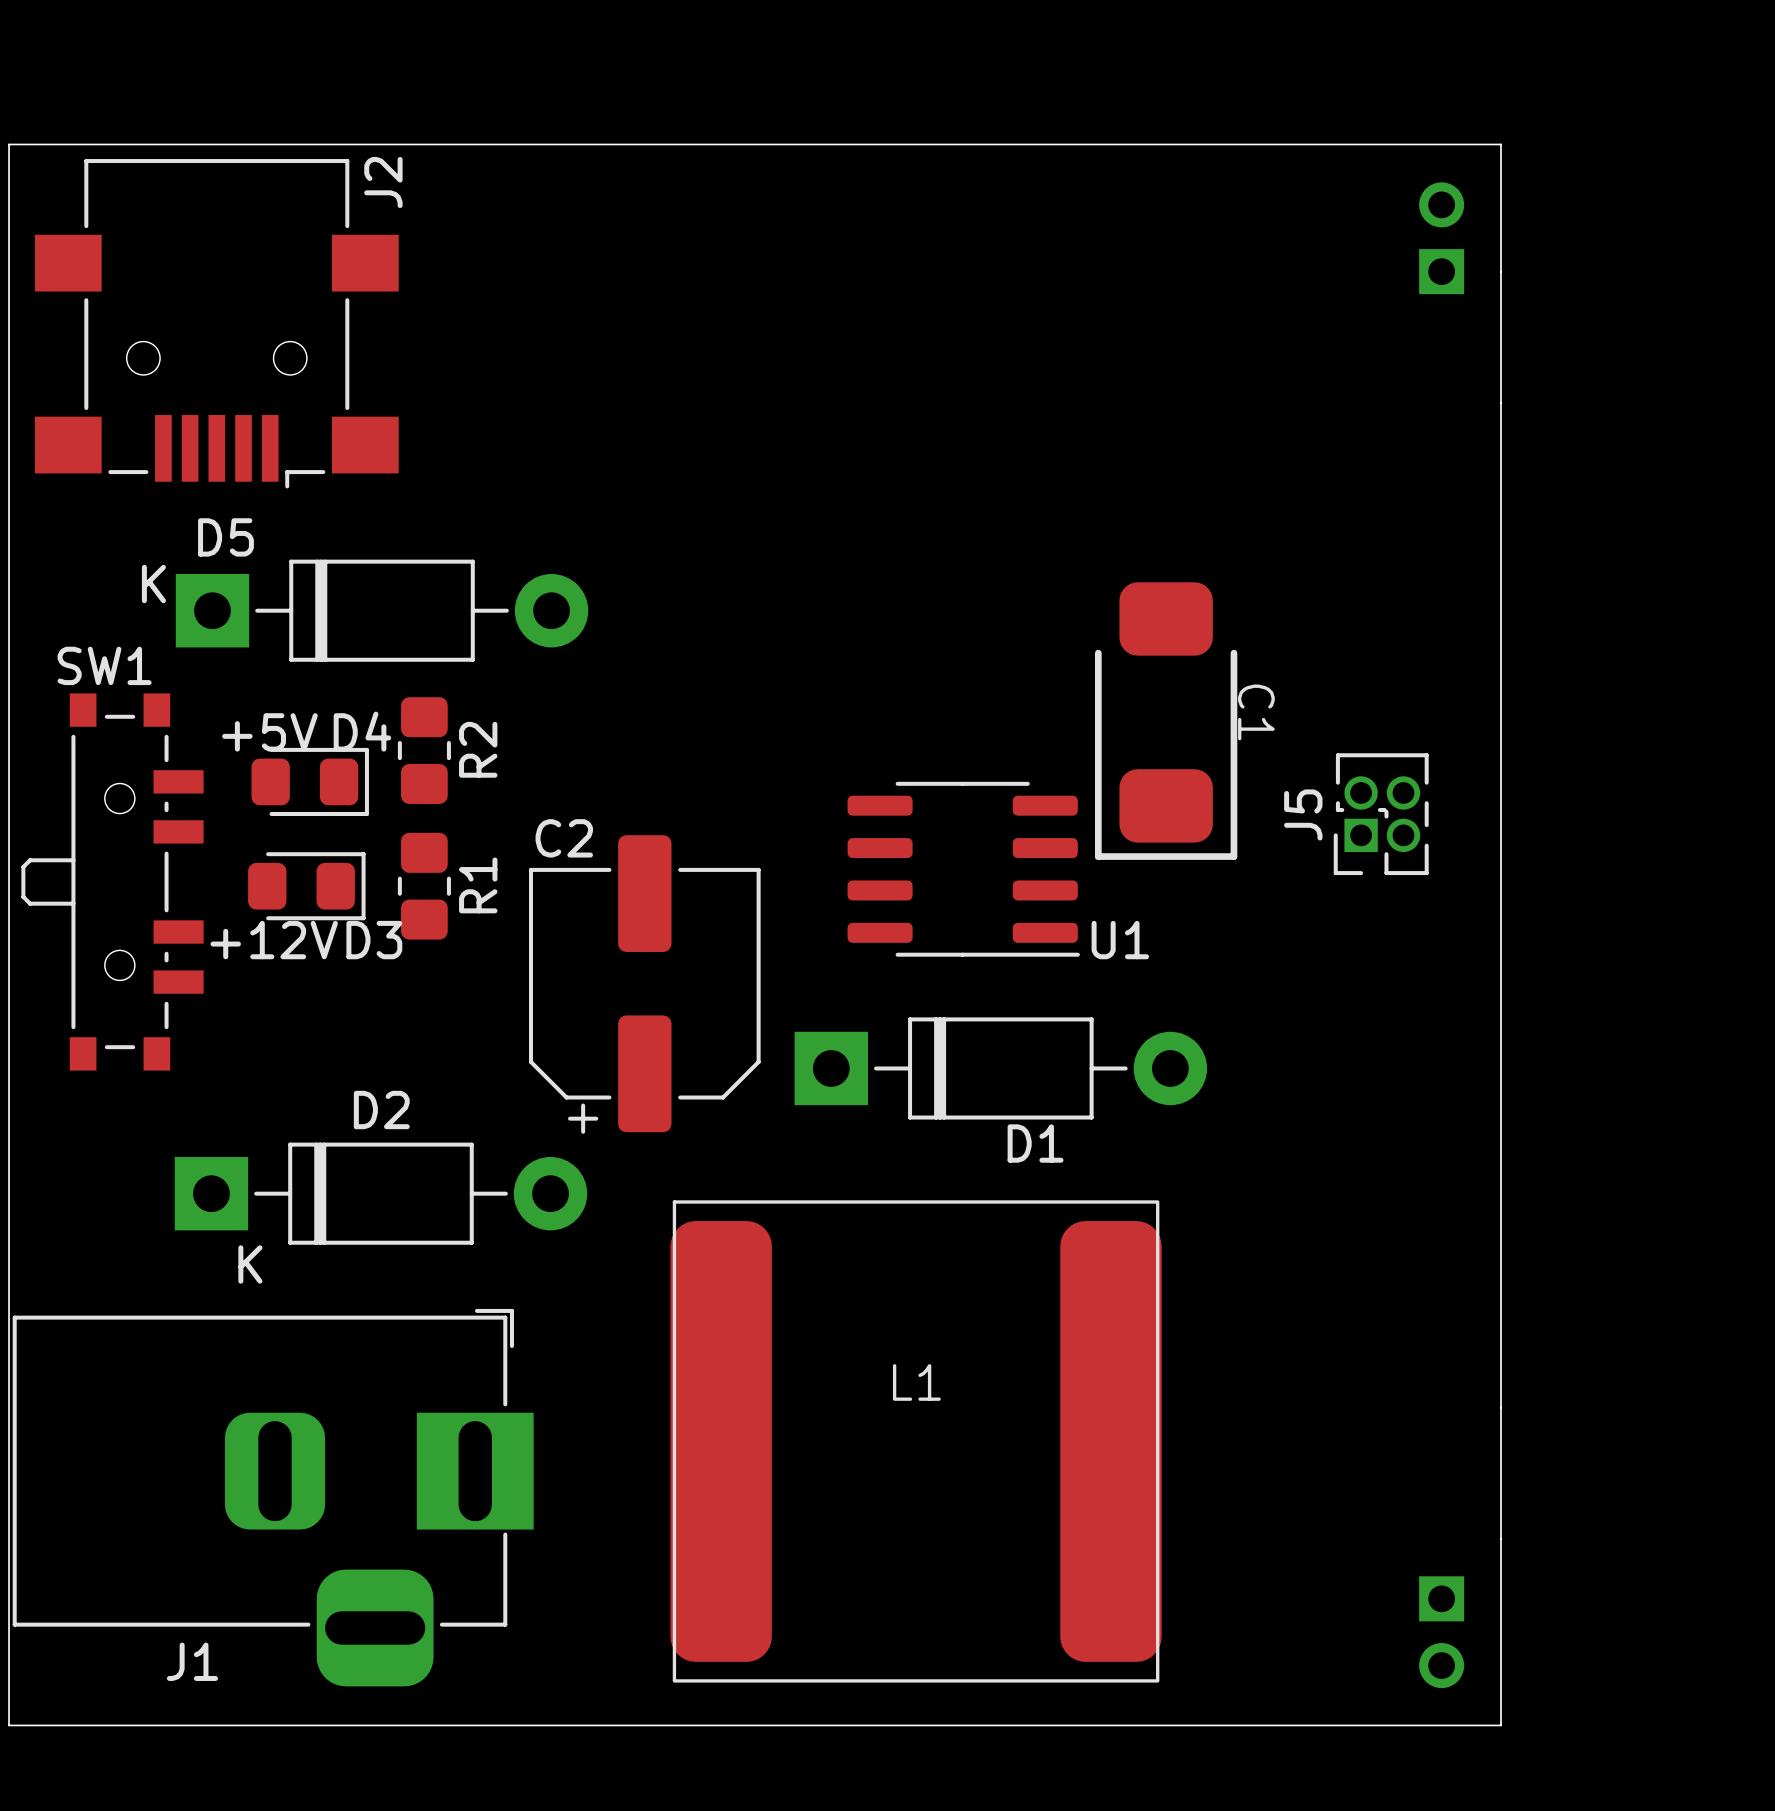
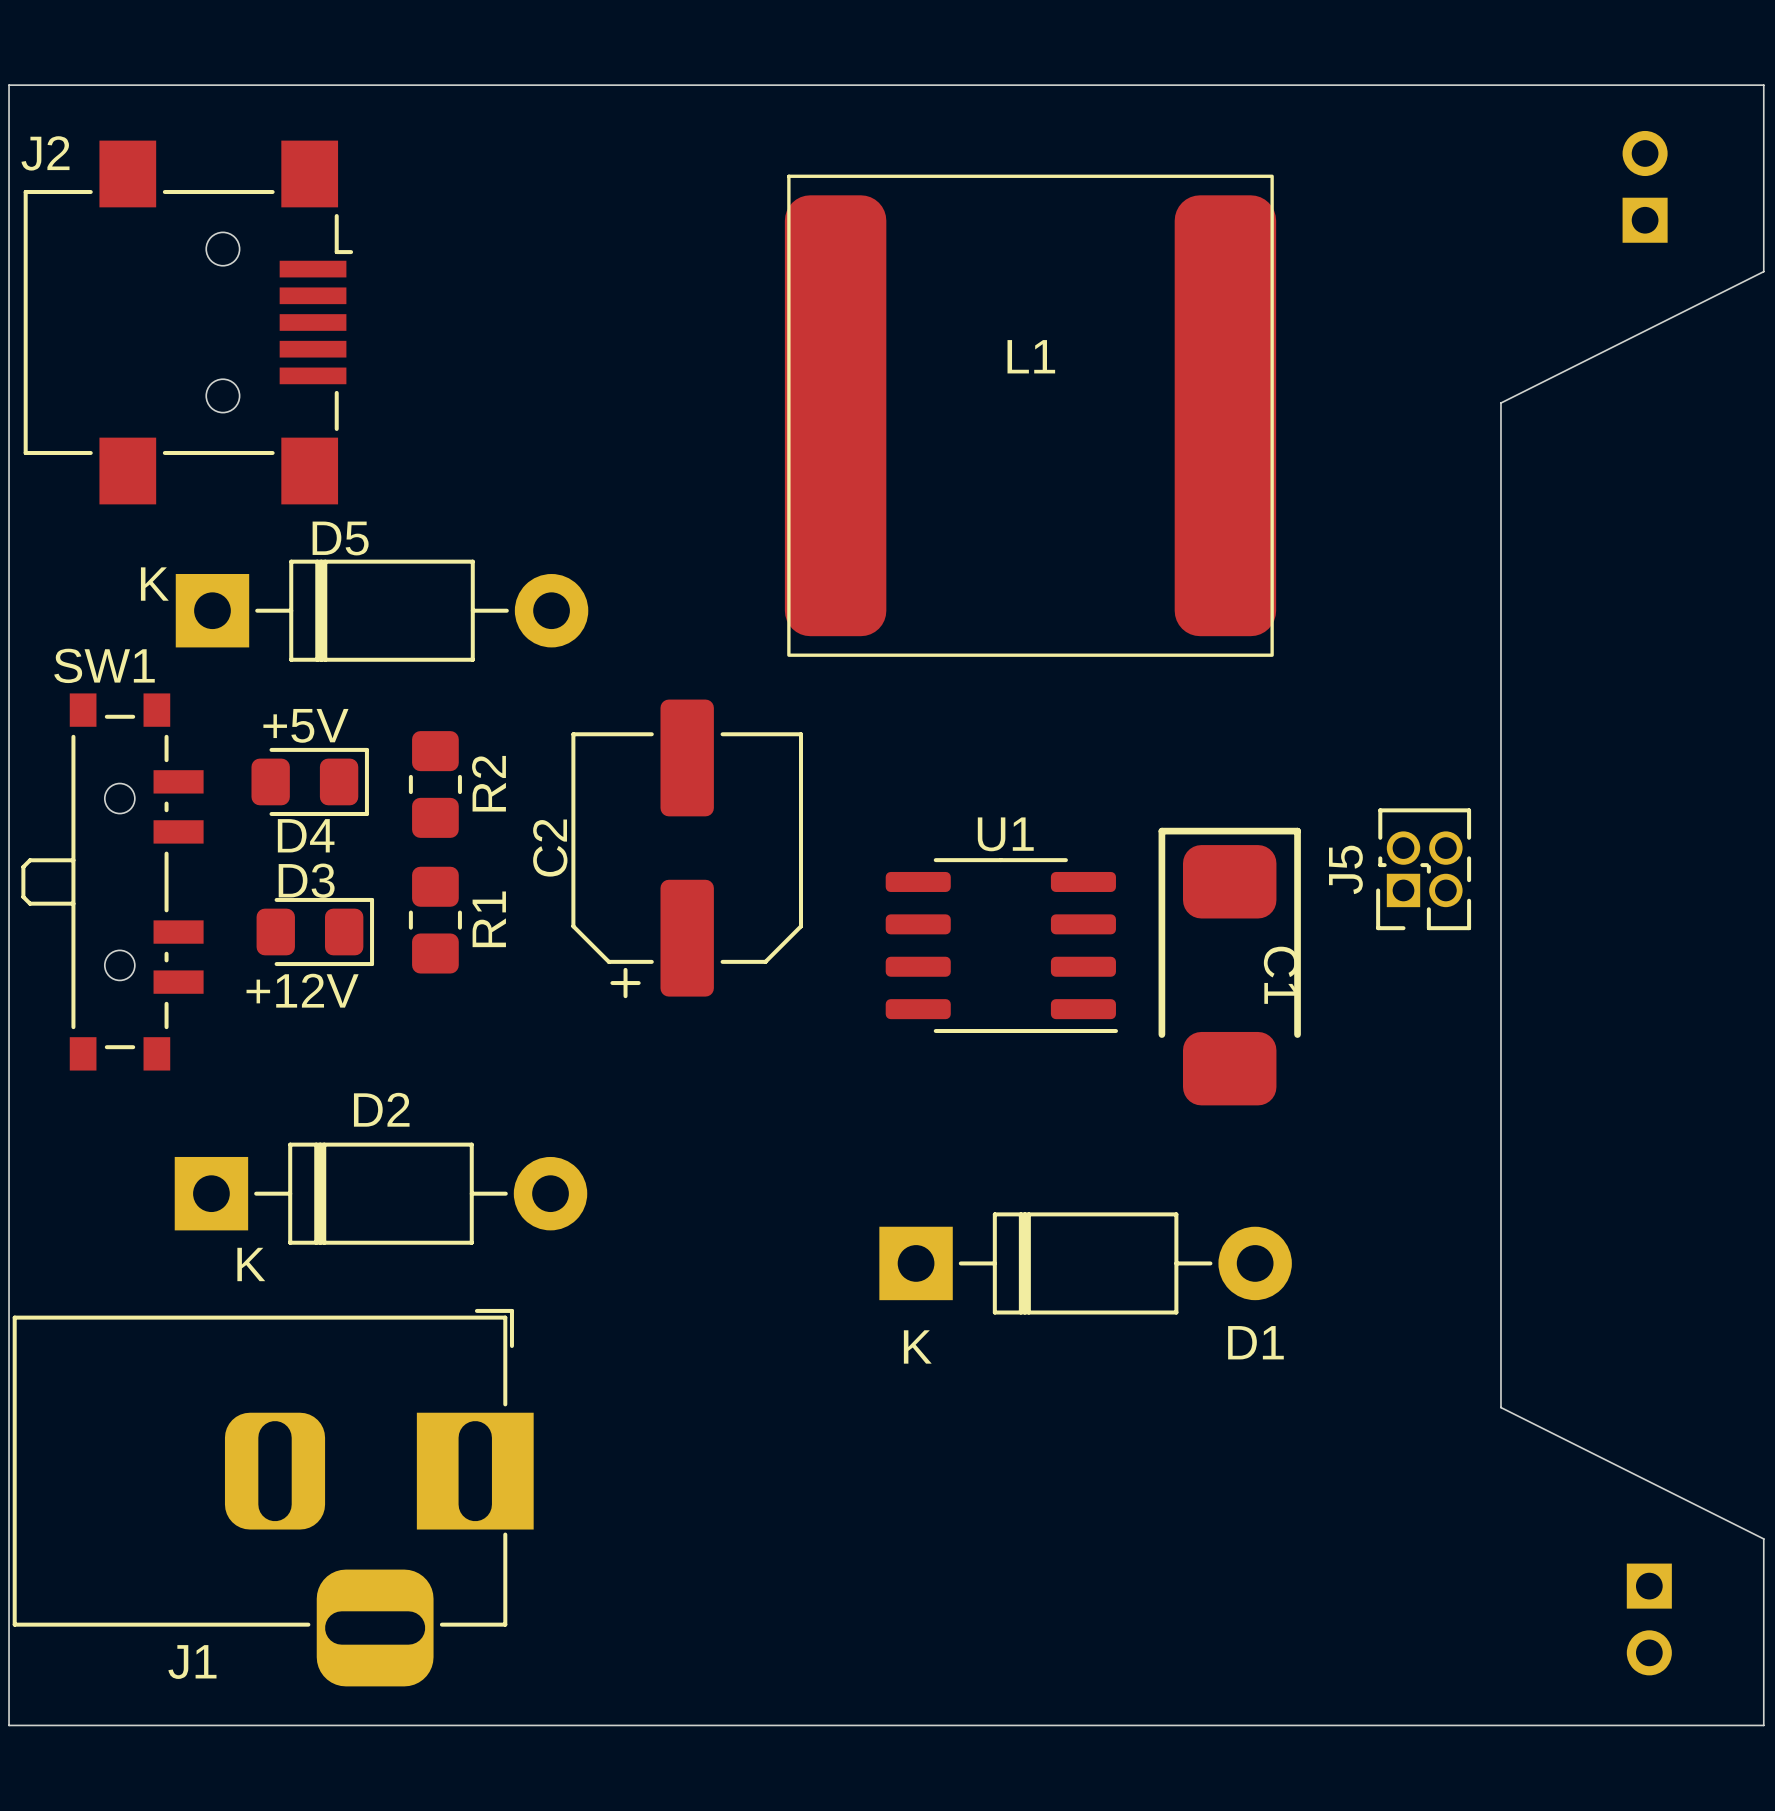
board edge: (9, 144) (1500, 144) (1500, 403) -> (9, 144) (9, 85) (1763, 85) (1763, 271) (1500, 403)
part position: (1441, 238) -> (1645, 186)
J2 rotation: 0° (216, 323) -> 90° counterclockwise (188, 322)
D5 name position: D5 (225, 537) -> D5 (340, 538)
C1 rotation: 0° (1166, 721) -> 180° (1229, 966)
C1 position: (1166, 721) -> (1229, 966)
D4 name position: D4 (362, 731) -> D4 (306, 835)
D4 value position: +5V (269, 732) -> +5V (305, 725)
R2 position: (424, 750) -> (435, 784)
J5 position: (1381, 814) -> (1423, 869)
C2 name rotation: 0° (564, 838) -> 90° counterclockwise (550, 848)
U1 position: (963, 869) -> (1001, 945)
D3 position: (306, 886) -> (315, 931)
R1 position: (424, 886) -> (435, 920)
D3 value position: +12V (274, 940) -> +12V (302, 990)
D3 name position: D3 (374, 940) -> D3 (306, 880)
U1 name position: U1 (1120, 940) -> U1 (1005, 834)
C2 position: (644, 984) -> (687, 848)
D1 position: (1000, 1068) -> (1085, 1263)
D1 name position: D1 (1035, 1143) -> D1 (1255, 1342)
D1 text: none -> K (917, 1346)
board edge: (1500, 1407) (1500, 1725) -> (1500, 1407) (1763, 1538) (1763, 1725) (1500, 1725)
L1 position: (916, 1441) -> (1030, 415)
part position: (1441, 1632) -> (1649, 1619)

